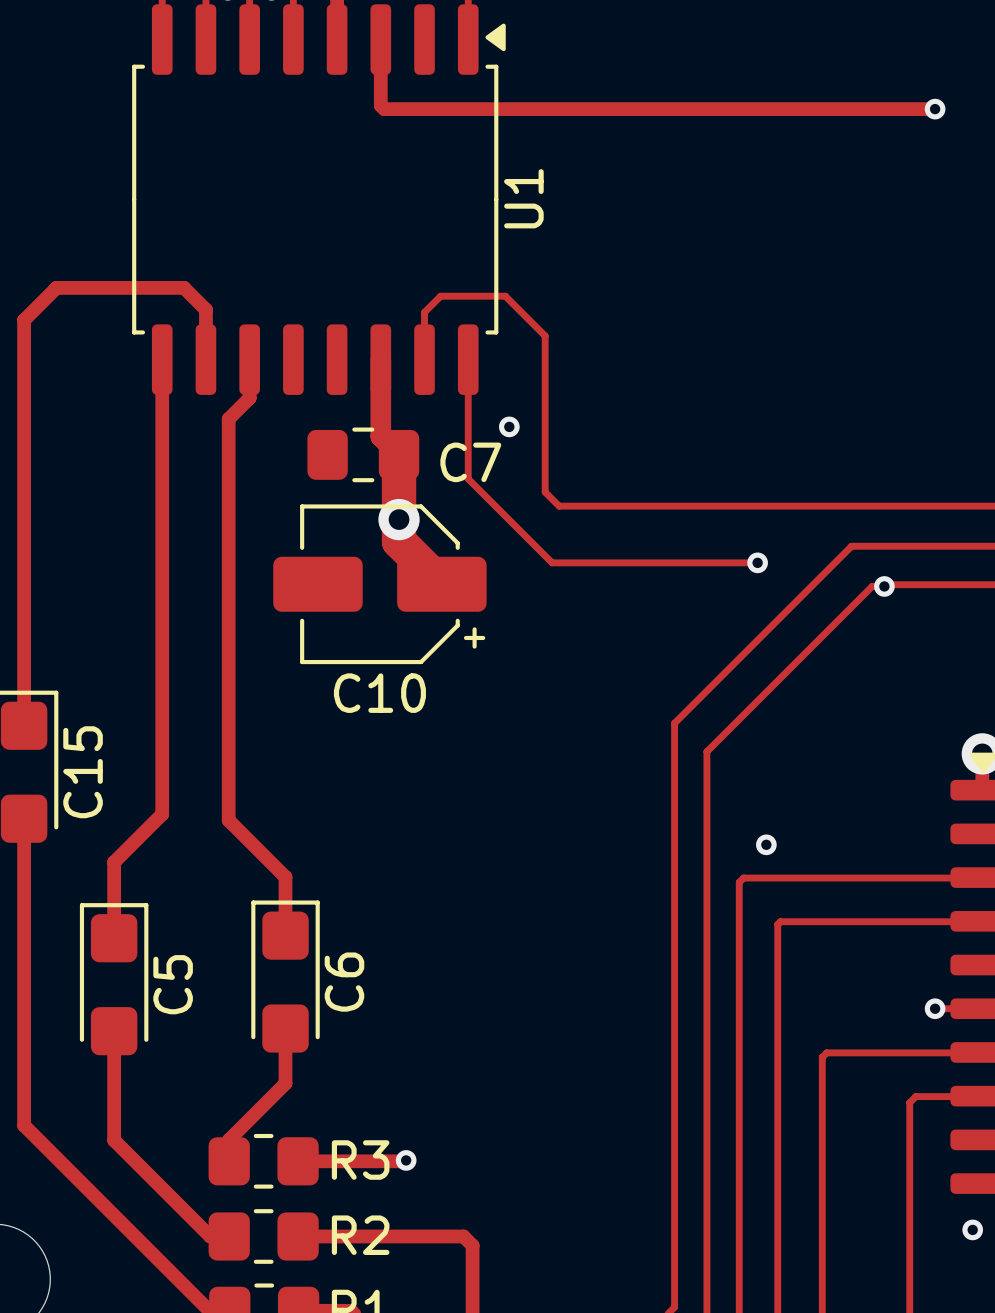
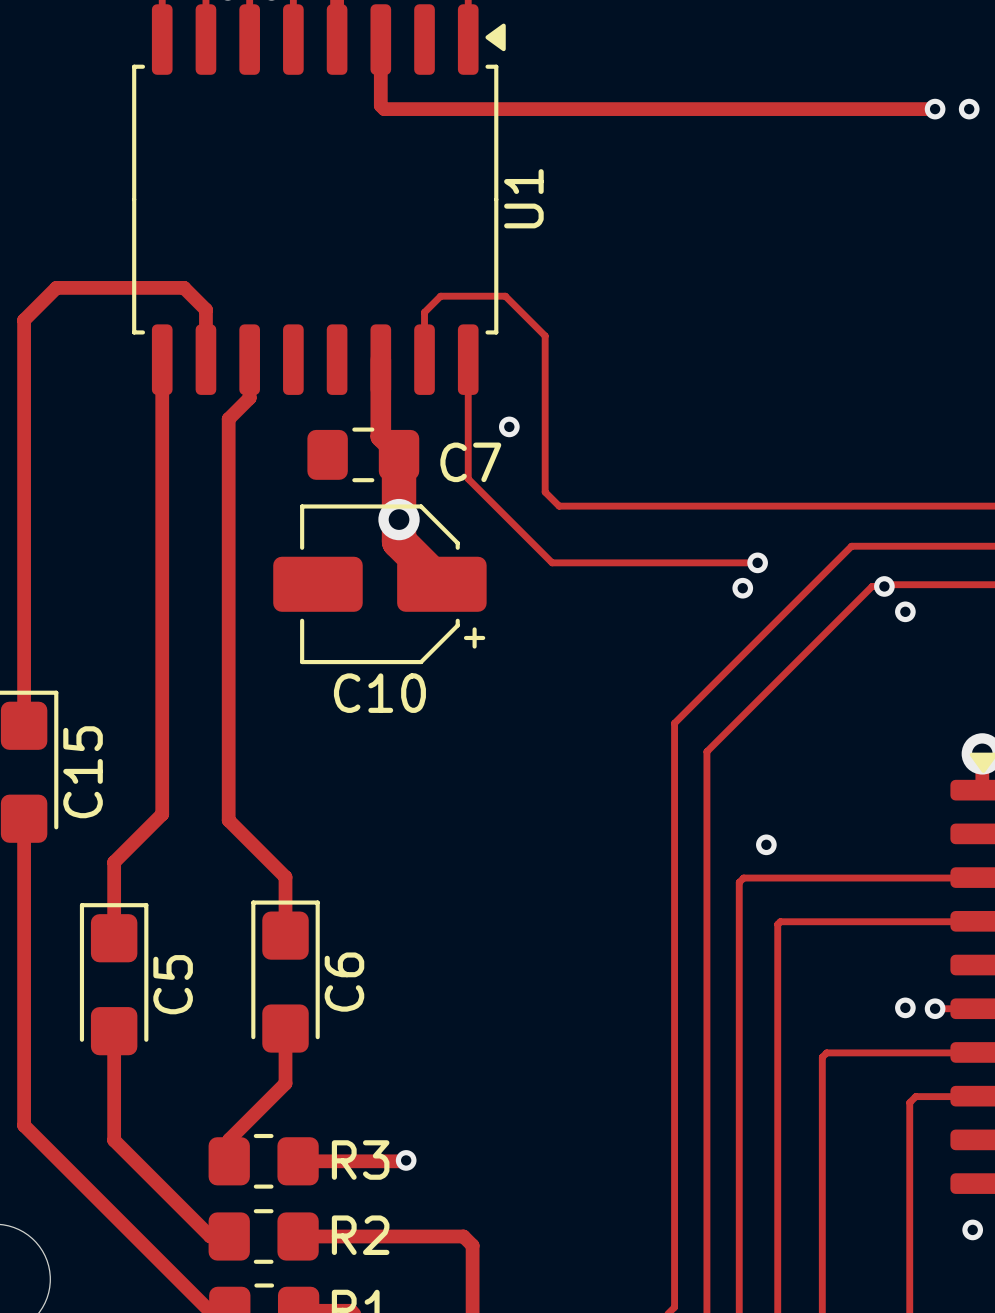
via: none -> (969, 109)
via: none -> (742, 588)
via: none -> (905, 611)
via: none -> (905, 1007)

